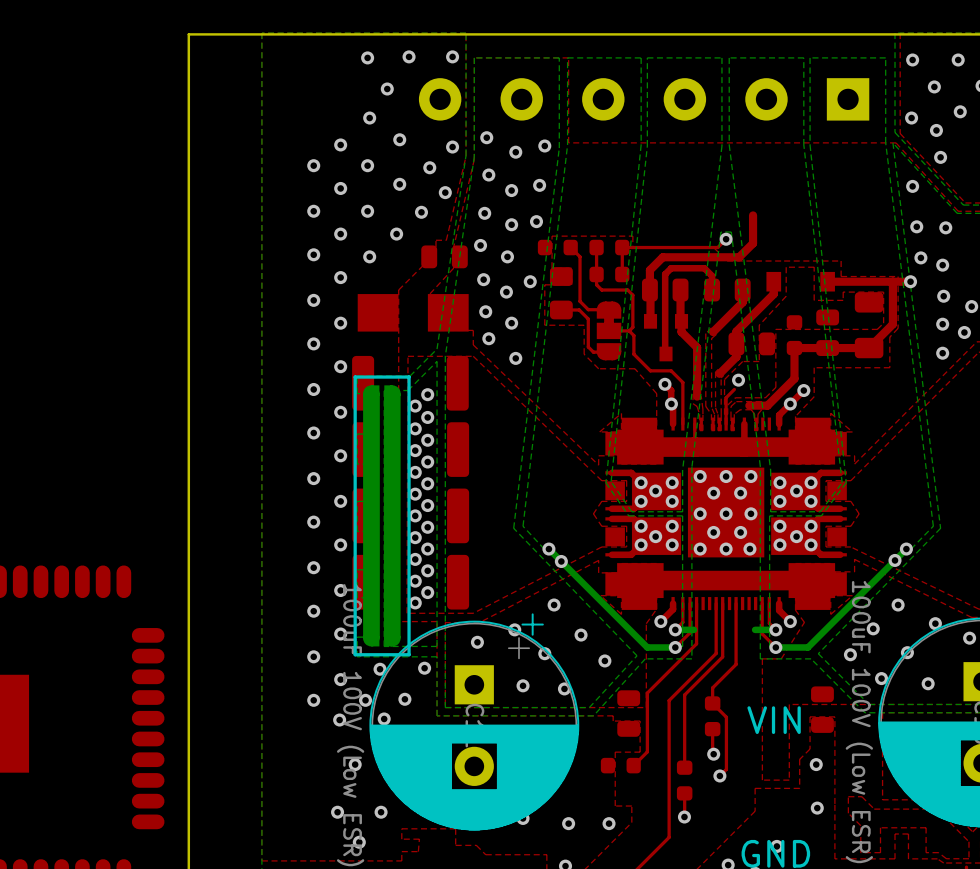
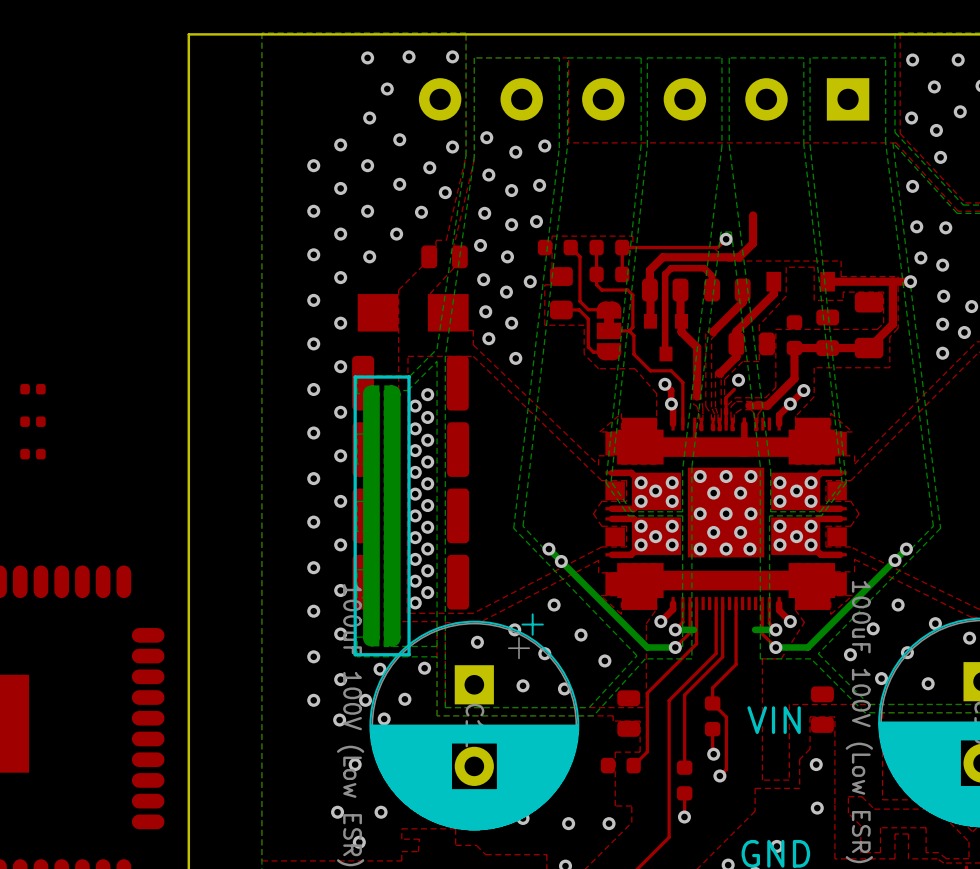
part: none -> (32, 389)
part: none -> (32, 421)
part: none -> (32, 454)

